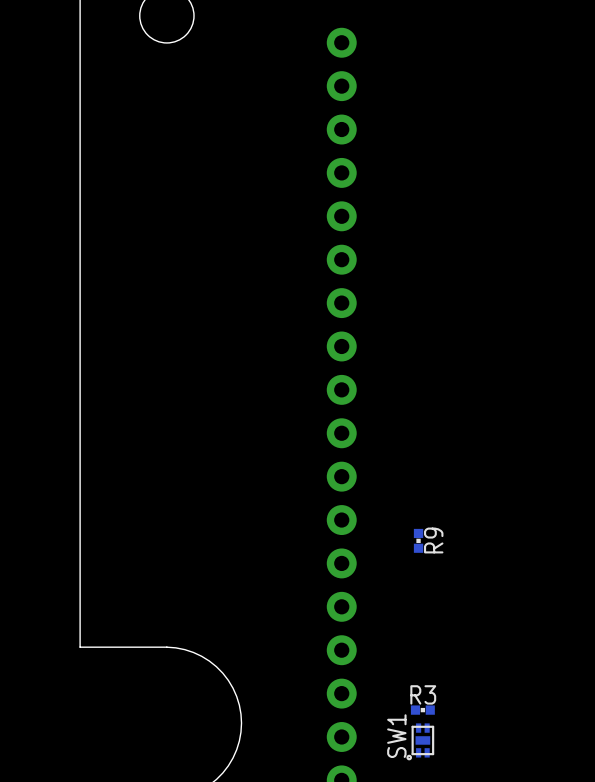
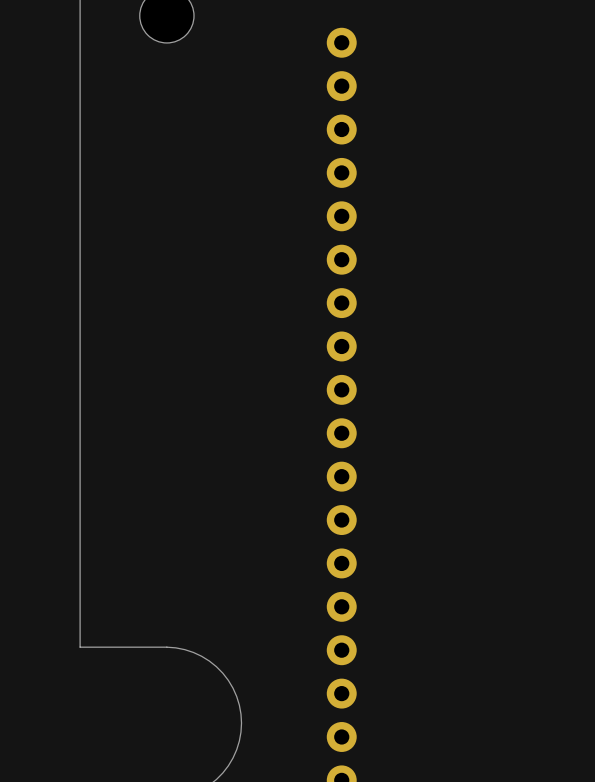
R9: (418, 540) -> none
R3: (422, 710) -> none
SW1: (420, 741) -> none

